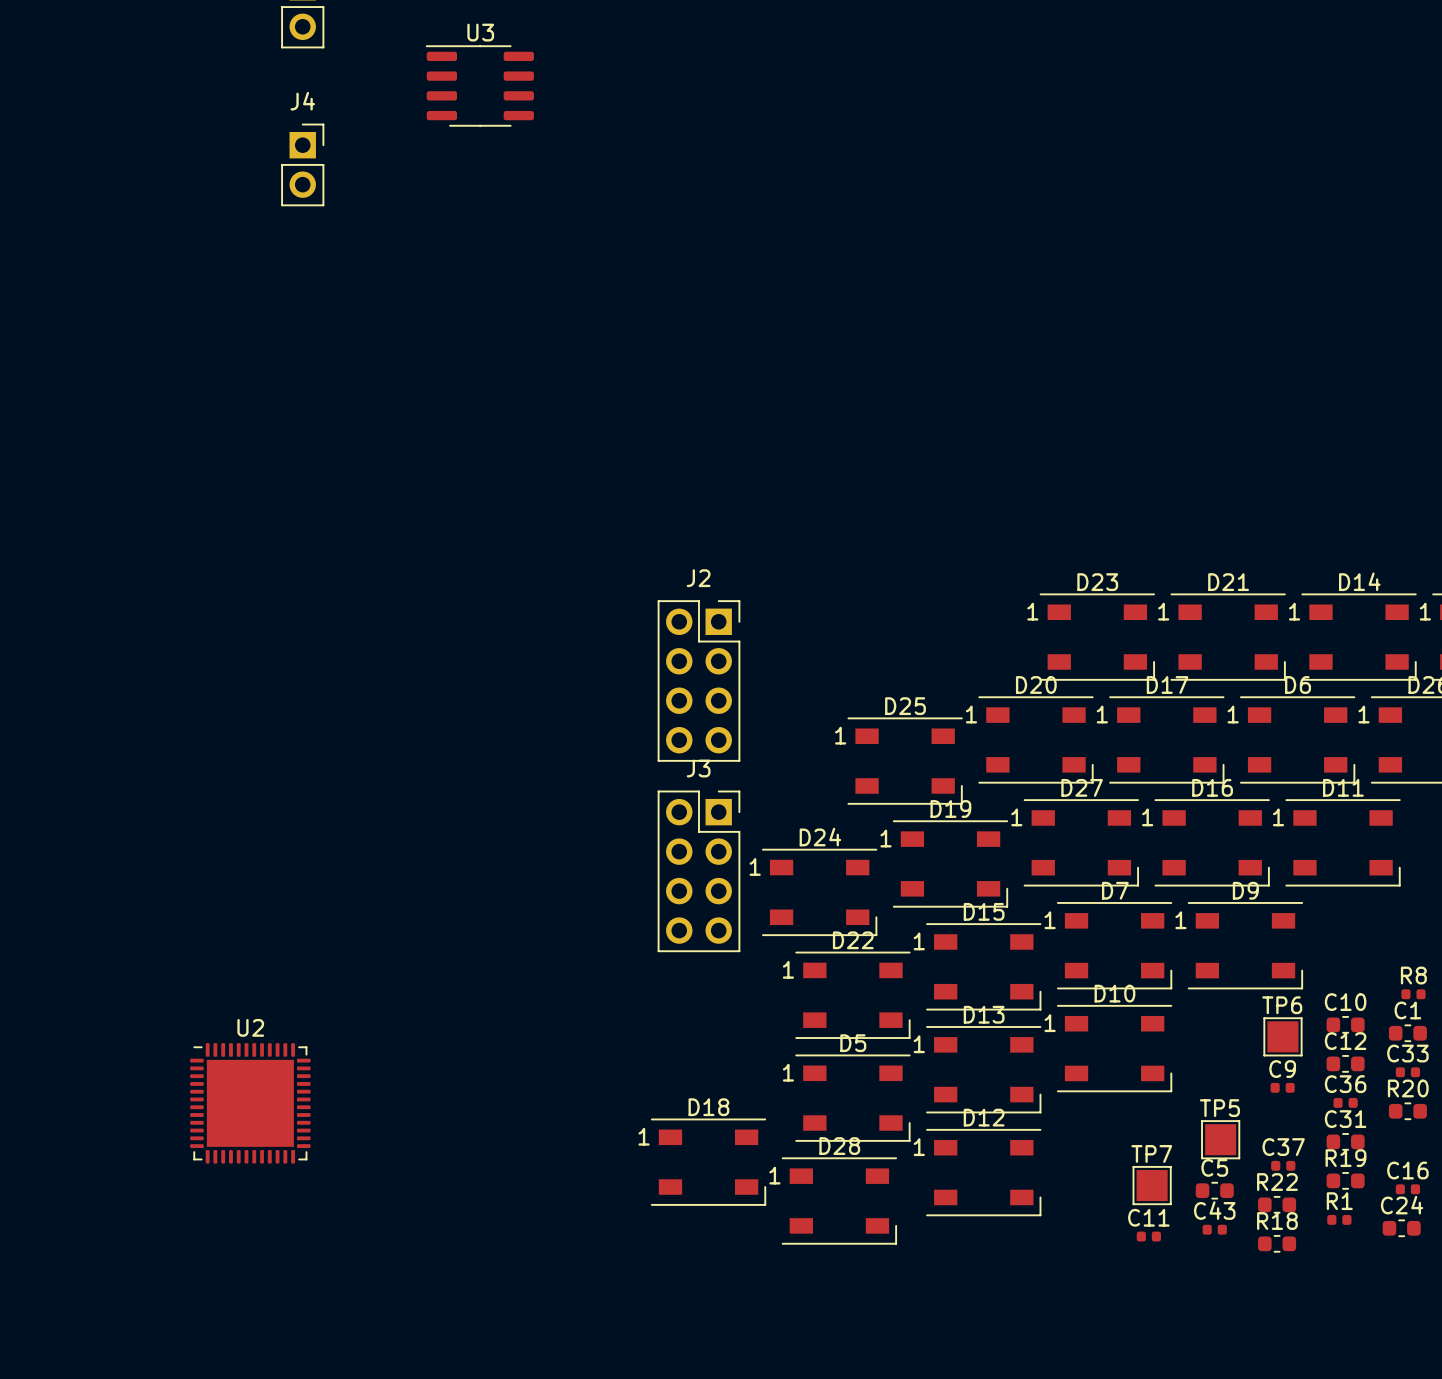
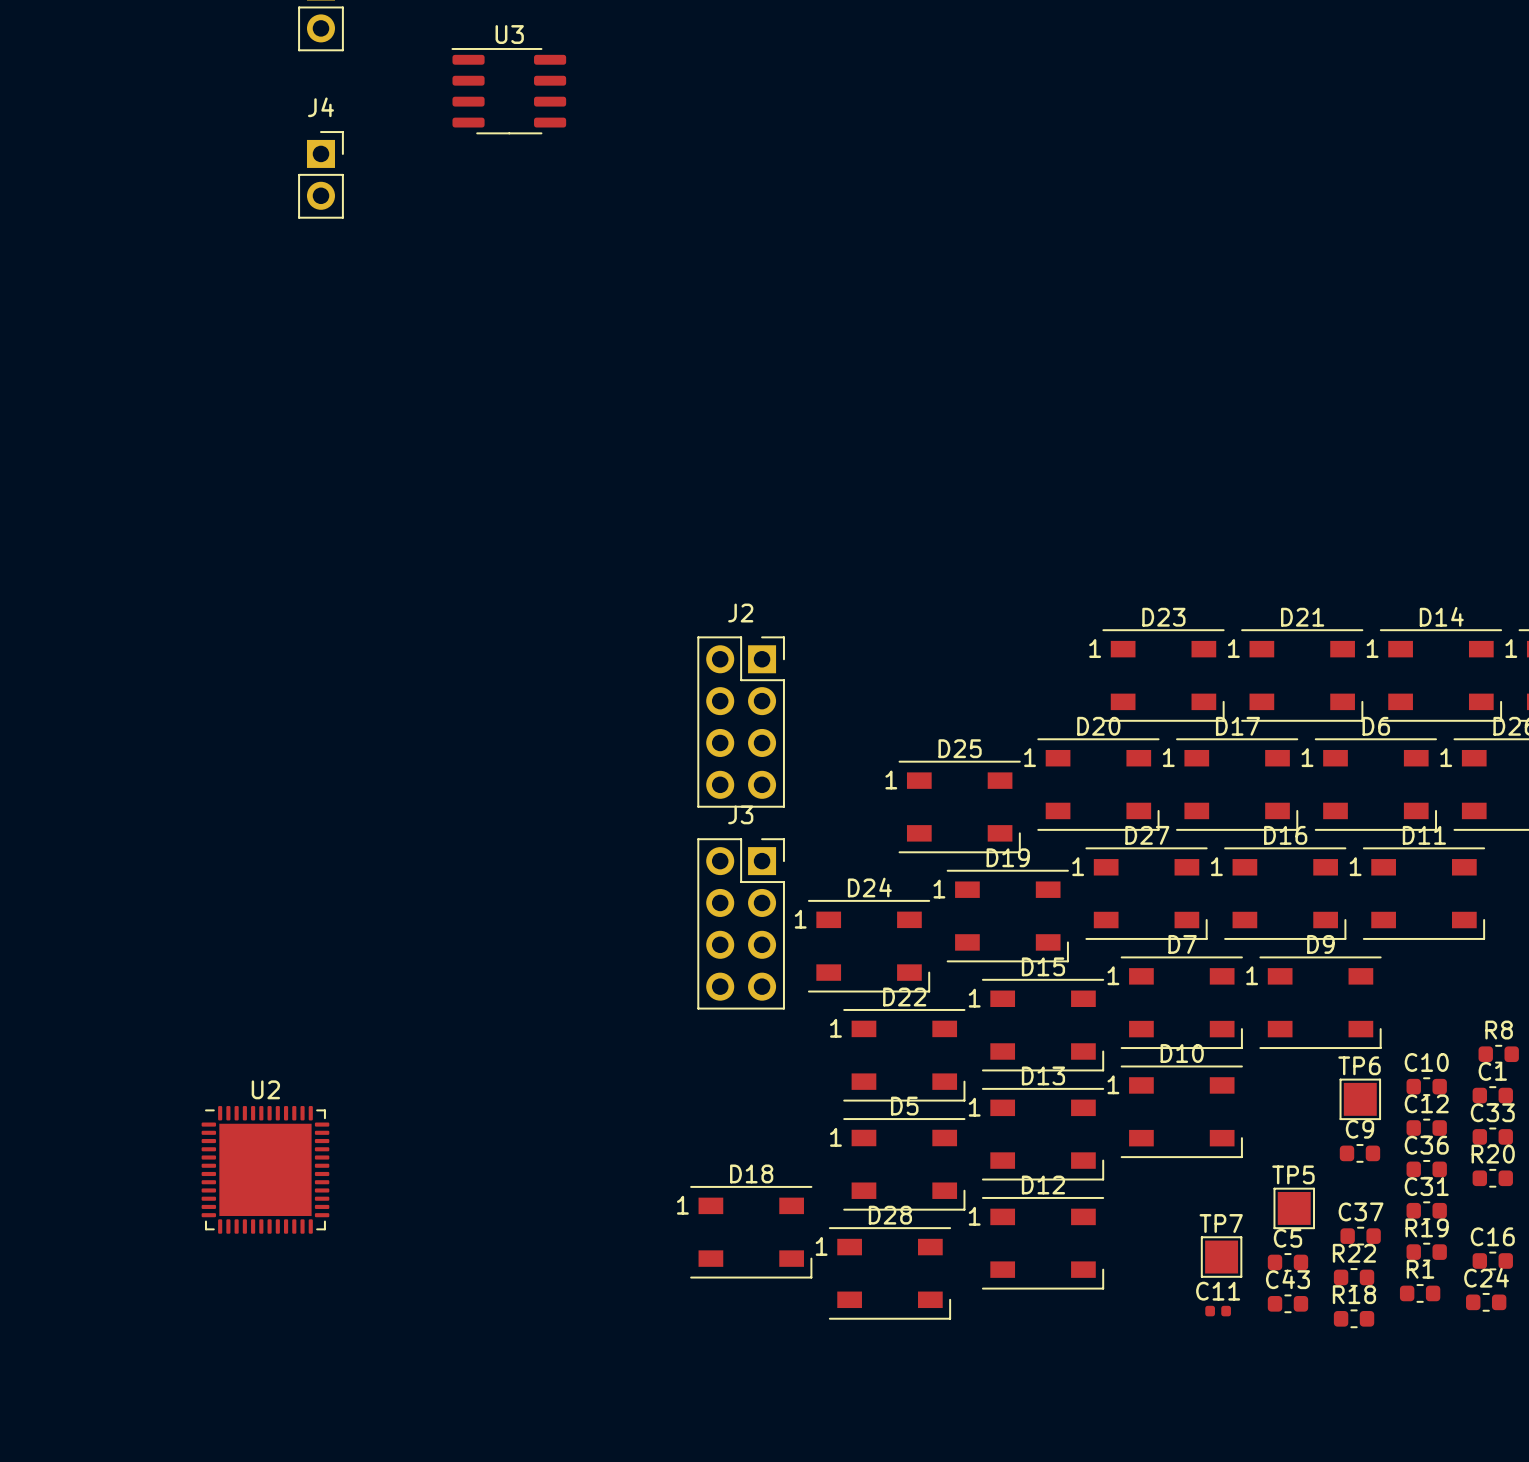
R8 footprint: [1401, 989, 1426, 1000] -> [1478, 1044, 1519, 1064]
C33 footprint: [1395, 1067, 1421, 1078] -> [1472, 1127, 1513, 1147]
C9 footprint: [1270, 1082, 1295, 1093] -> [1339, 1144, 1381, 1163]
C36 footprint: [1333, 1097, 1358, 1108] -> [1406, 1159, 1447, 1179]
C37 footprint: [1271, 1160, 1296, 1171] -> [1340, 1226, 1381, 1246]
C16 footprint: [1395, 1184, 1421, 1195] -> [1472, 1251, 1513, 1271]
R1 footprint: [1327, 1214, 1352, 1225] -> [1399, 1284, 1441, 1303]
C43 footprint: [1202, 1224, 1227, 1235] -> [1267, 1294, 1309, 1314]

